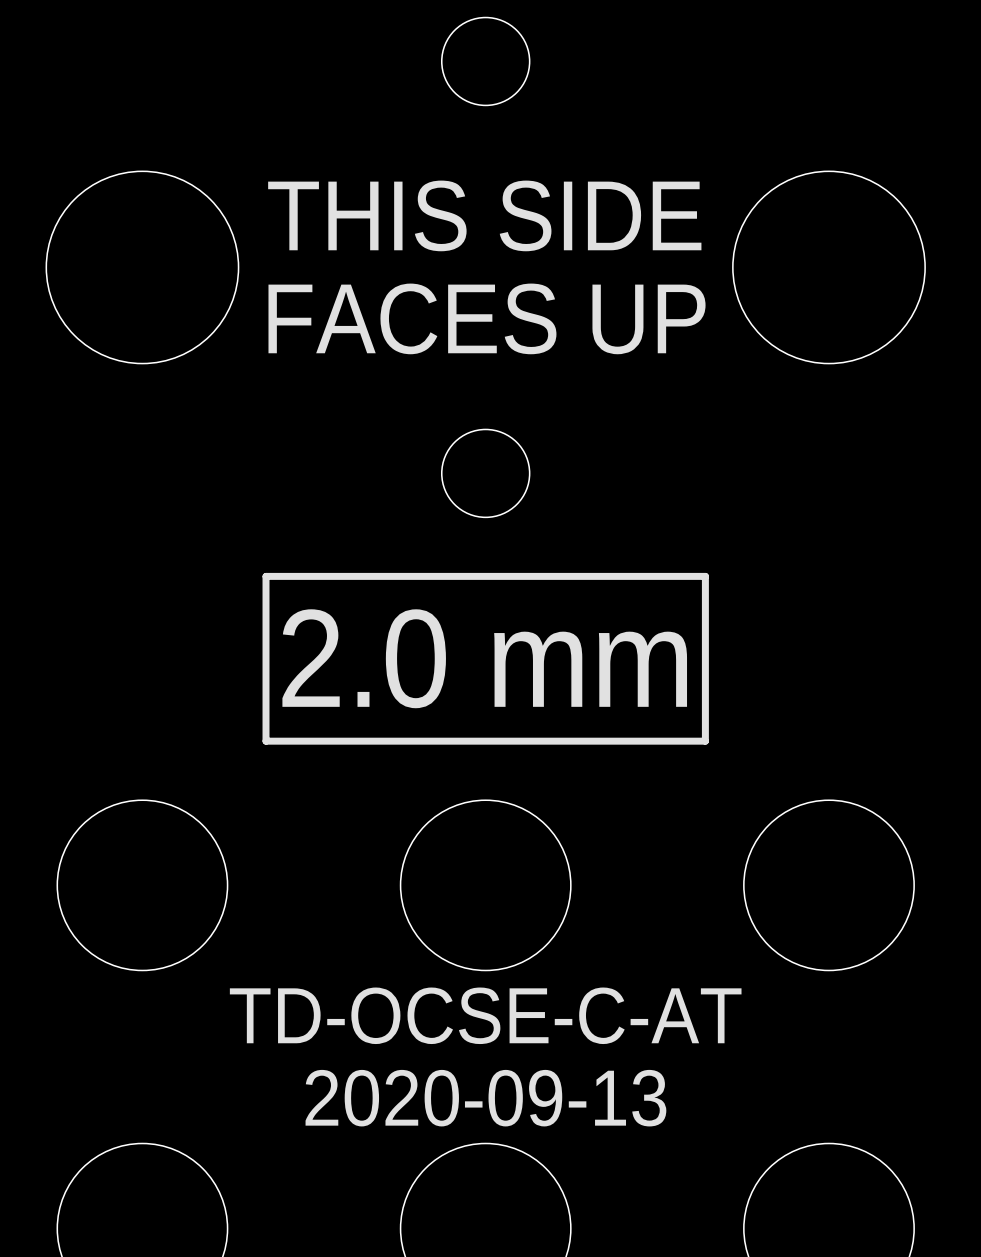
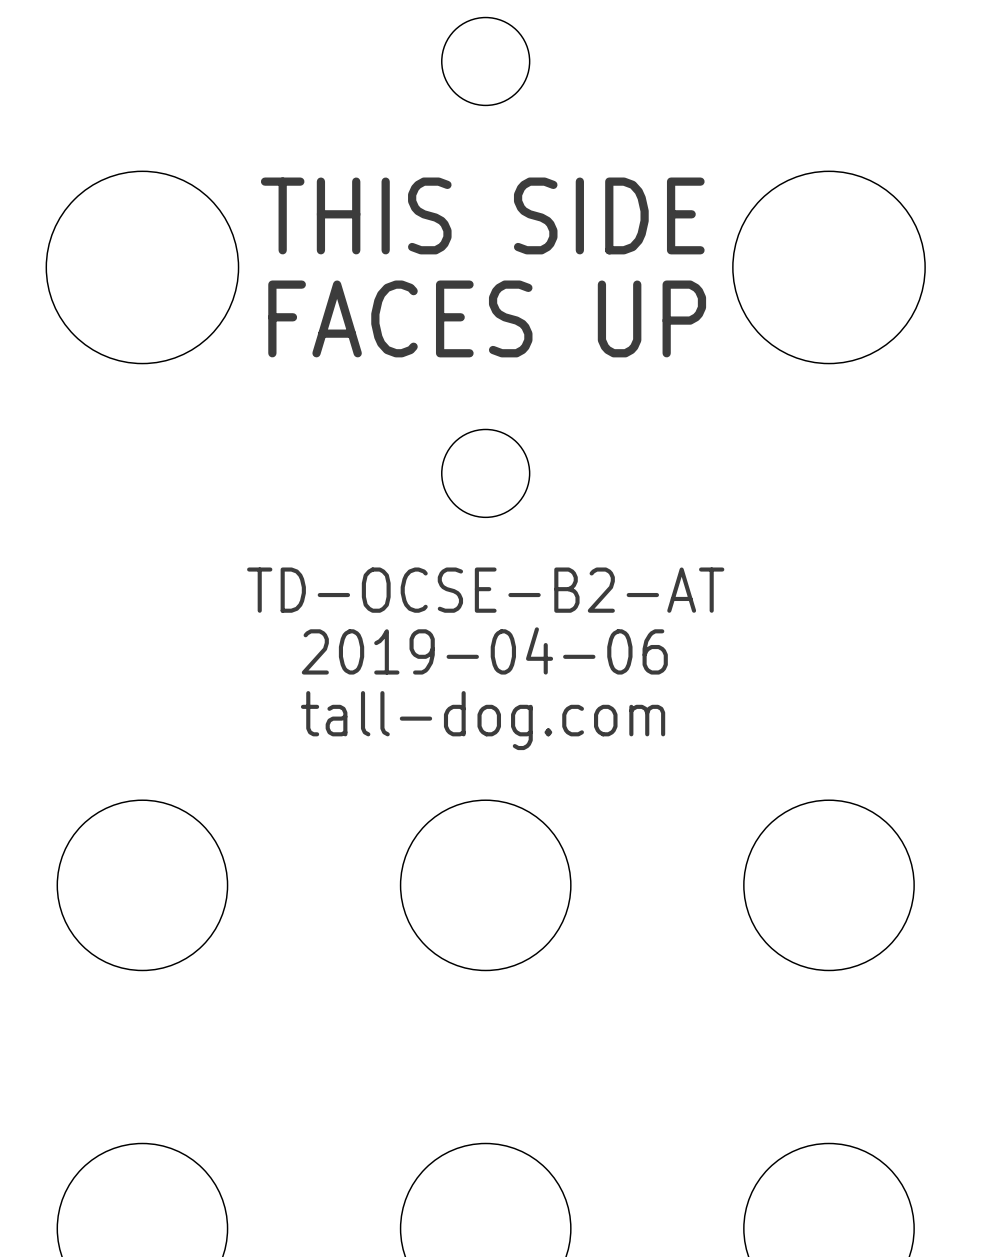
line: (266, 576) (705, 576) (705, 741) (266, 741) (266, 576) -> none
text: none -> TD-OCSE-B2-AT (485, 590)
text: 2.0 mm (484, 658) -> 2019-04-06 (484, 650)
text: none -> tall-dog.com (483, 720)
text: TD-OCSE-C-AT (485, 1015) -> none
text: 2020-09-13 (485, 1098) -> none

